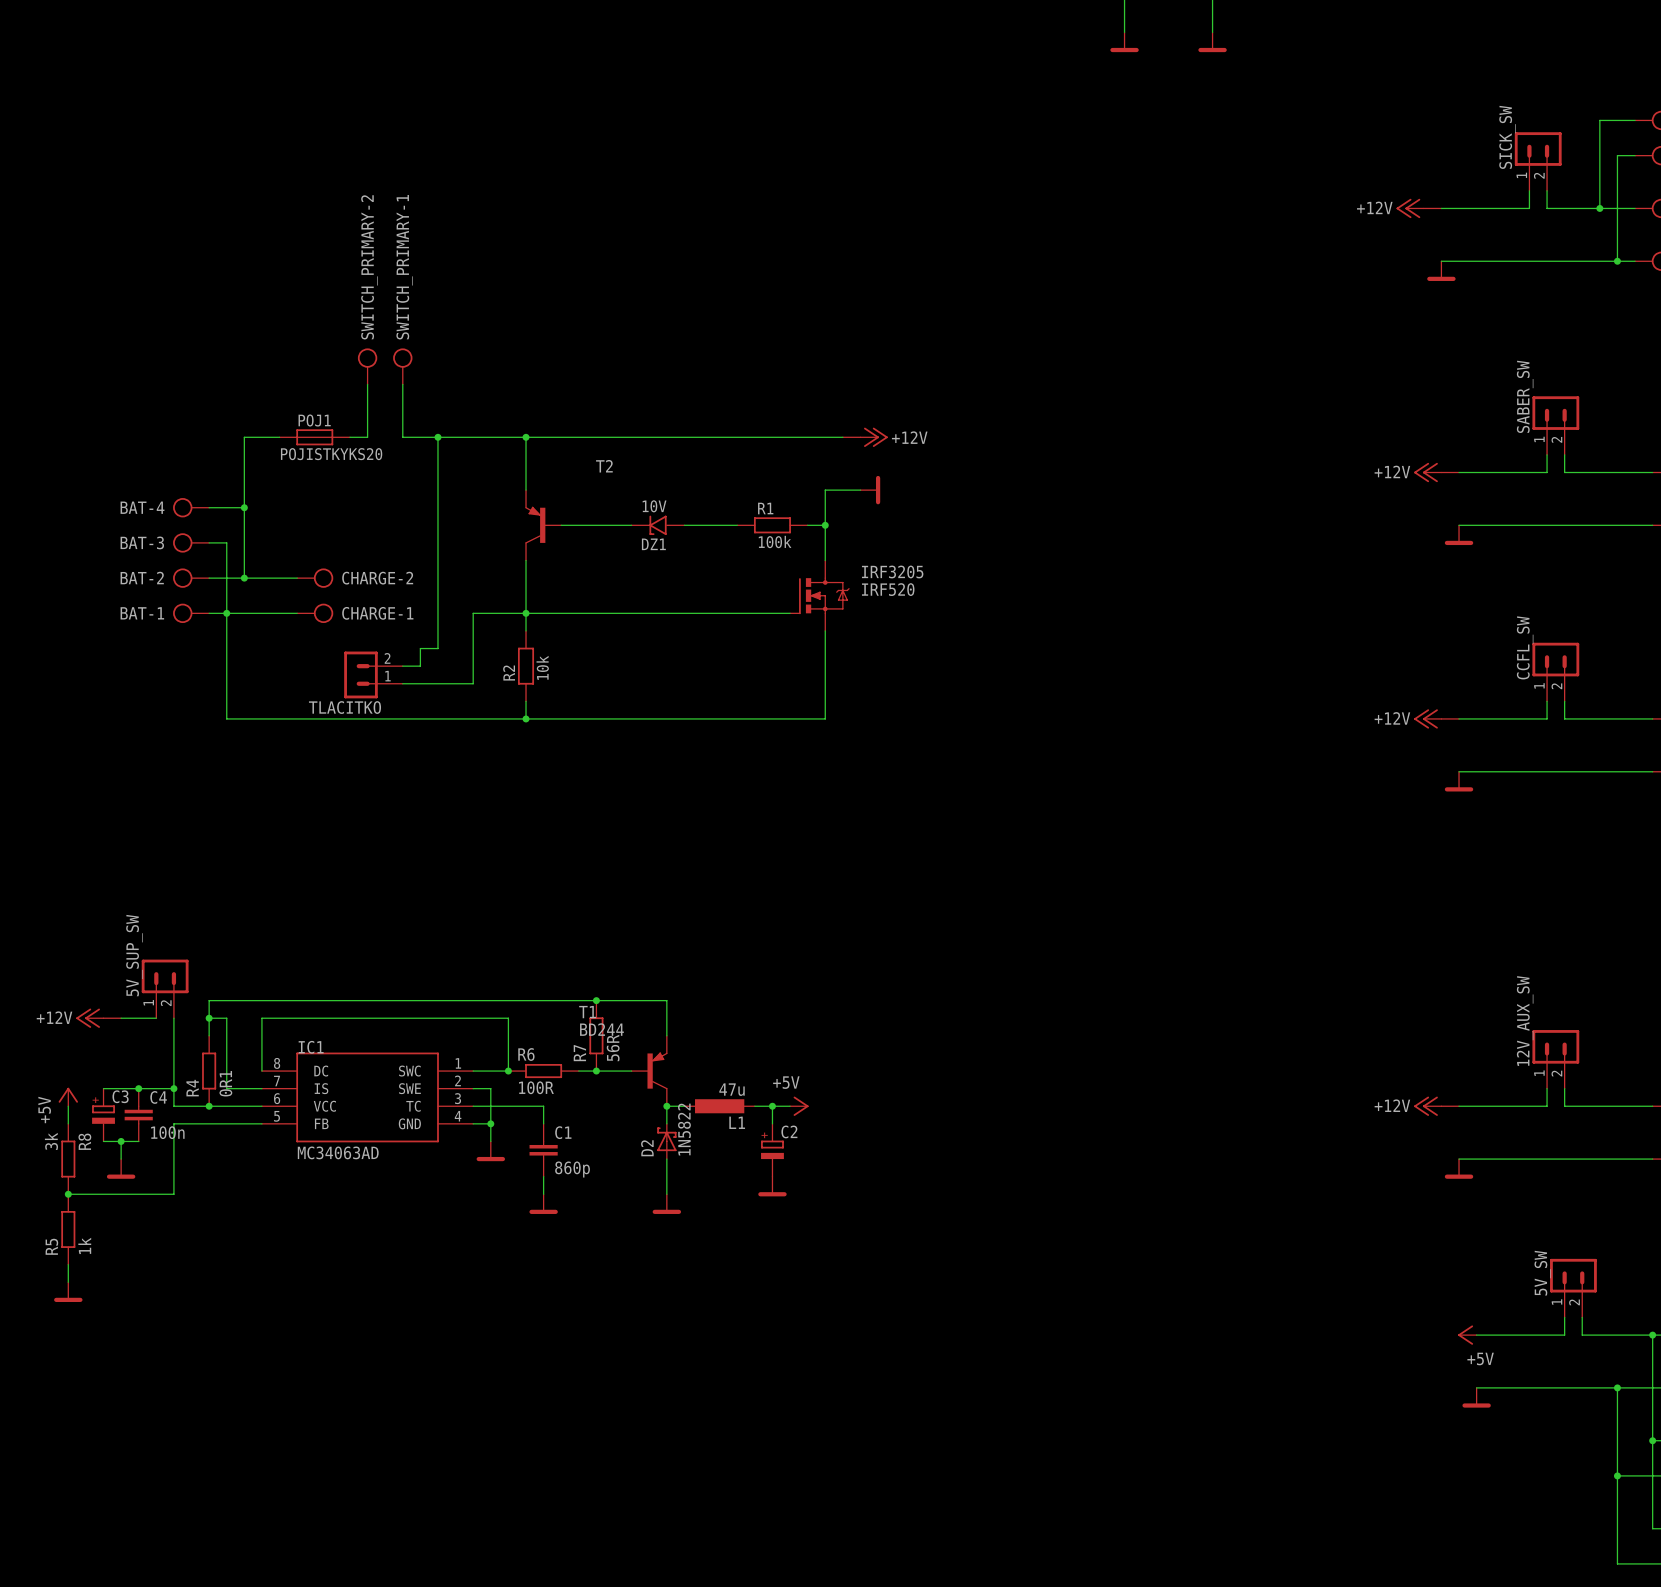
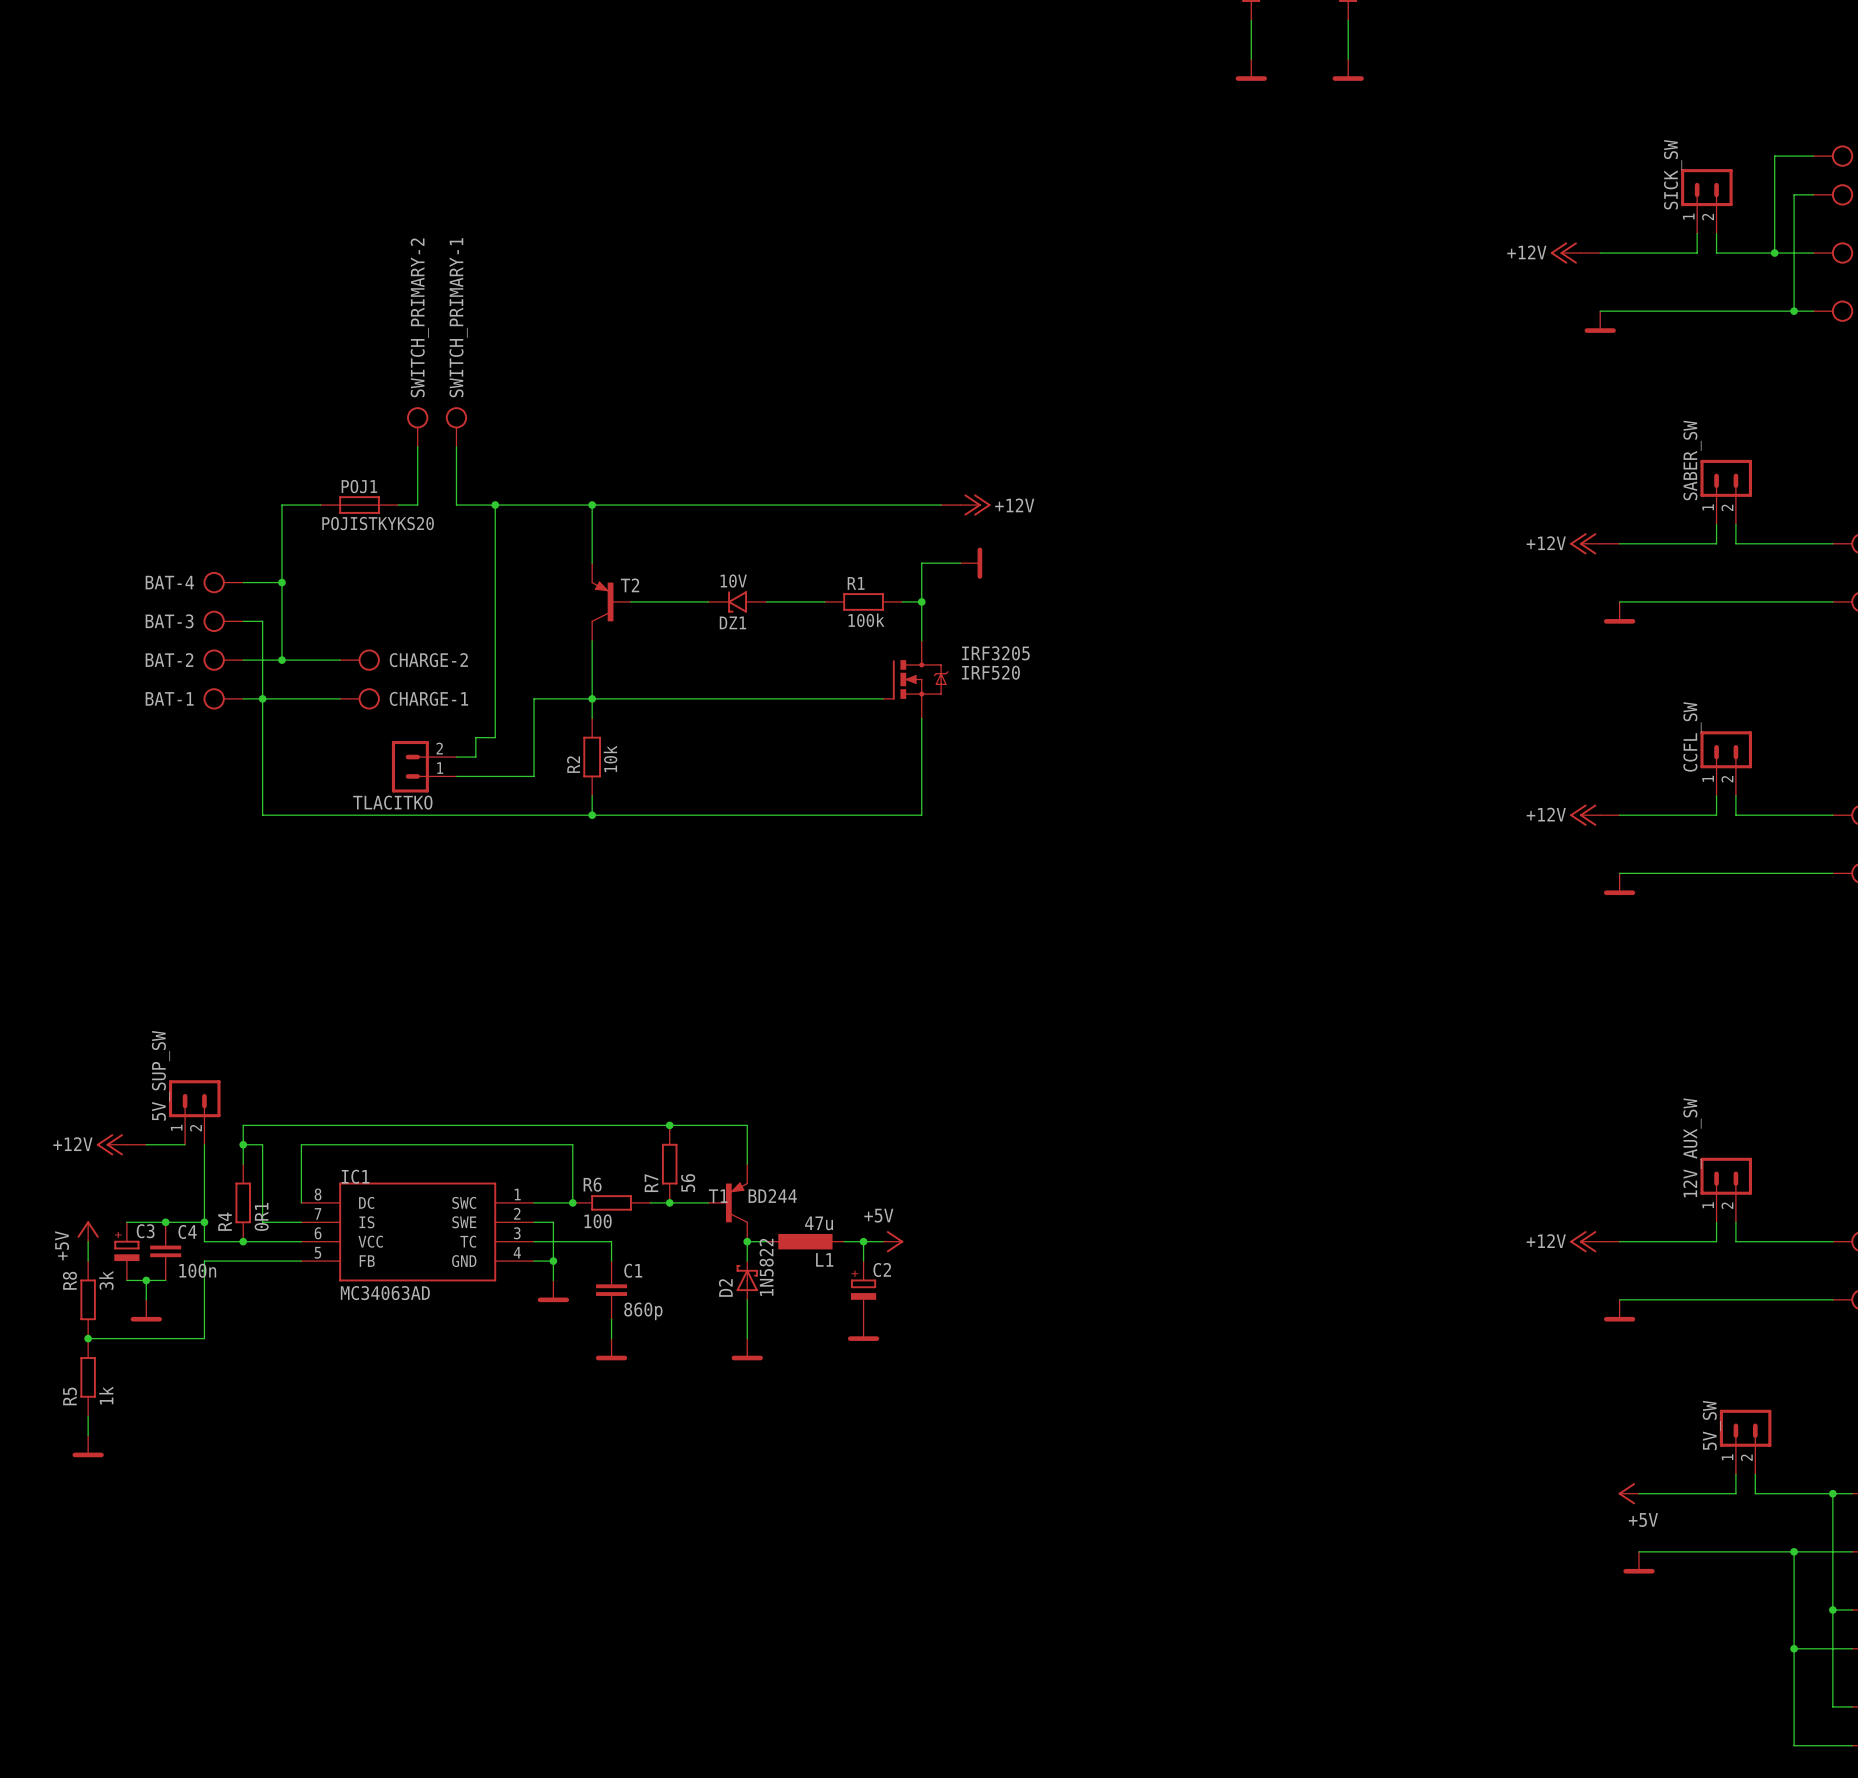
T2 name position: T2 (604, 466) -> T2 (630, 585)
T1 name position: T1 (587, 1012) -> T1 (718, 1196)
T1 value position: BD244 (601, 1029) -> BD244 (772, 1196)
R7 value: 56R (613, 1047) -> 56 (688, 1183)
R6 value: 100R (536, 1087) -> 100 (598, 1221)
R8 value position: 3k (51, 1141) -> 3k (106, 1280)
R8 name position: R8 (84, 1141) -> R8 (69, 1280)

